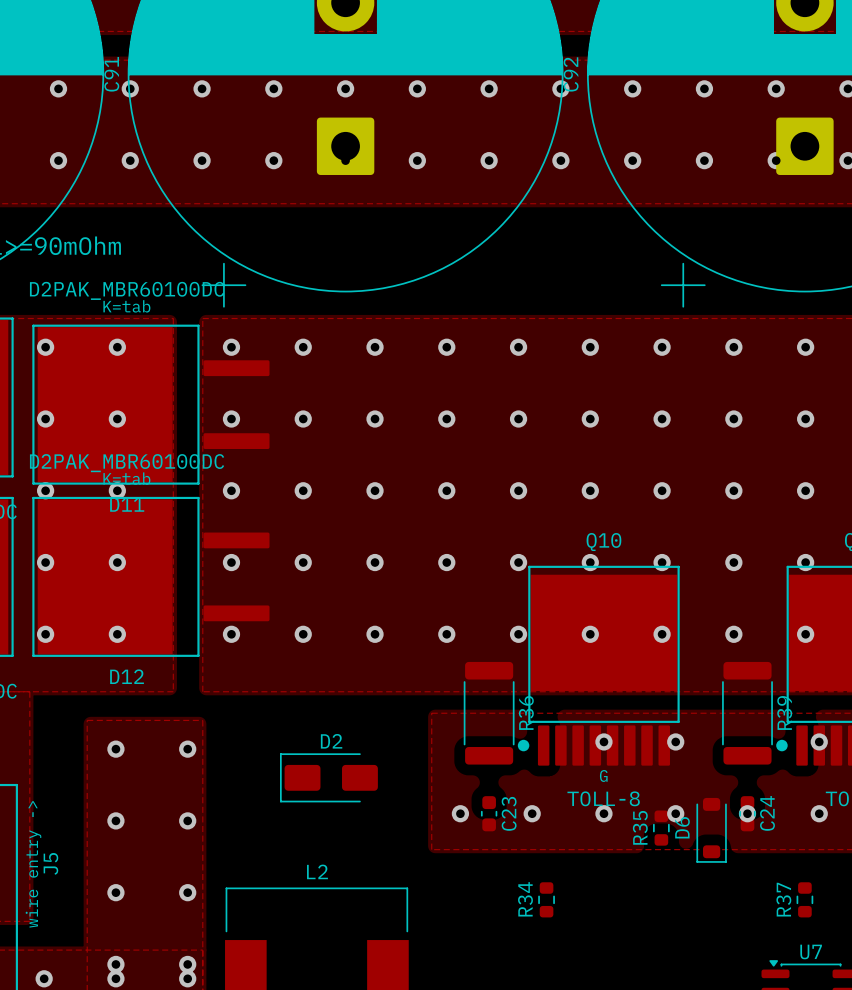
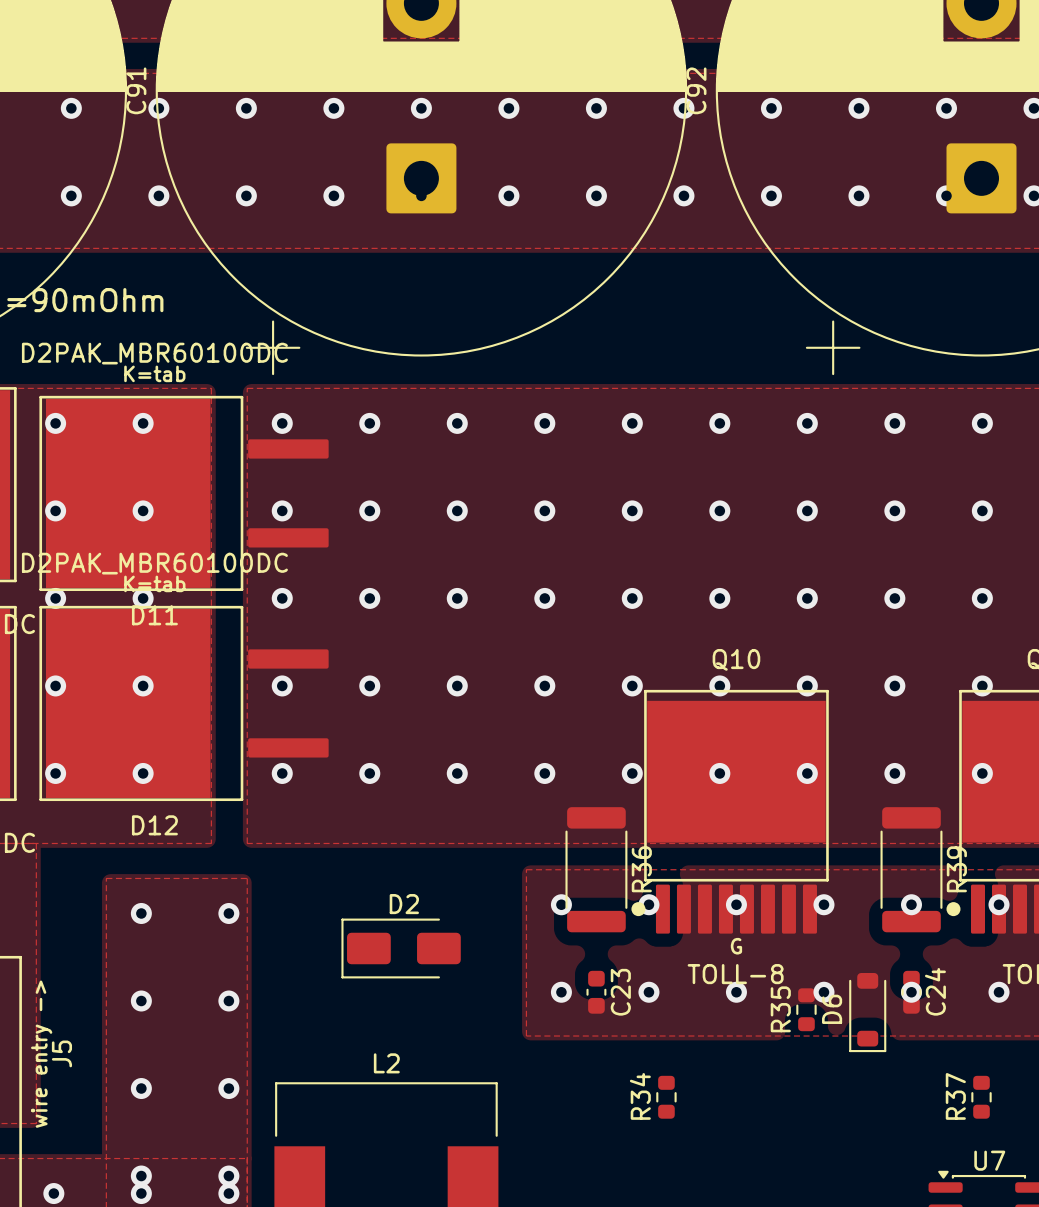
via: none -> (561, 904)
via: none -> (648, 904)
via: none -> (911, 904)

